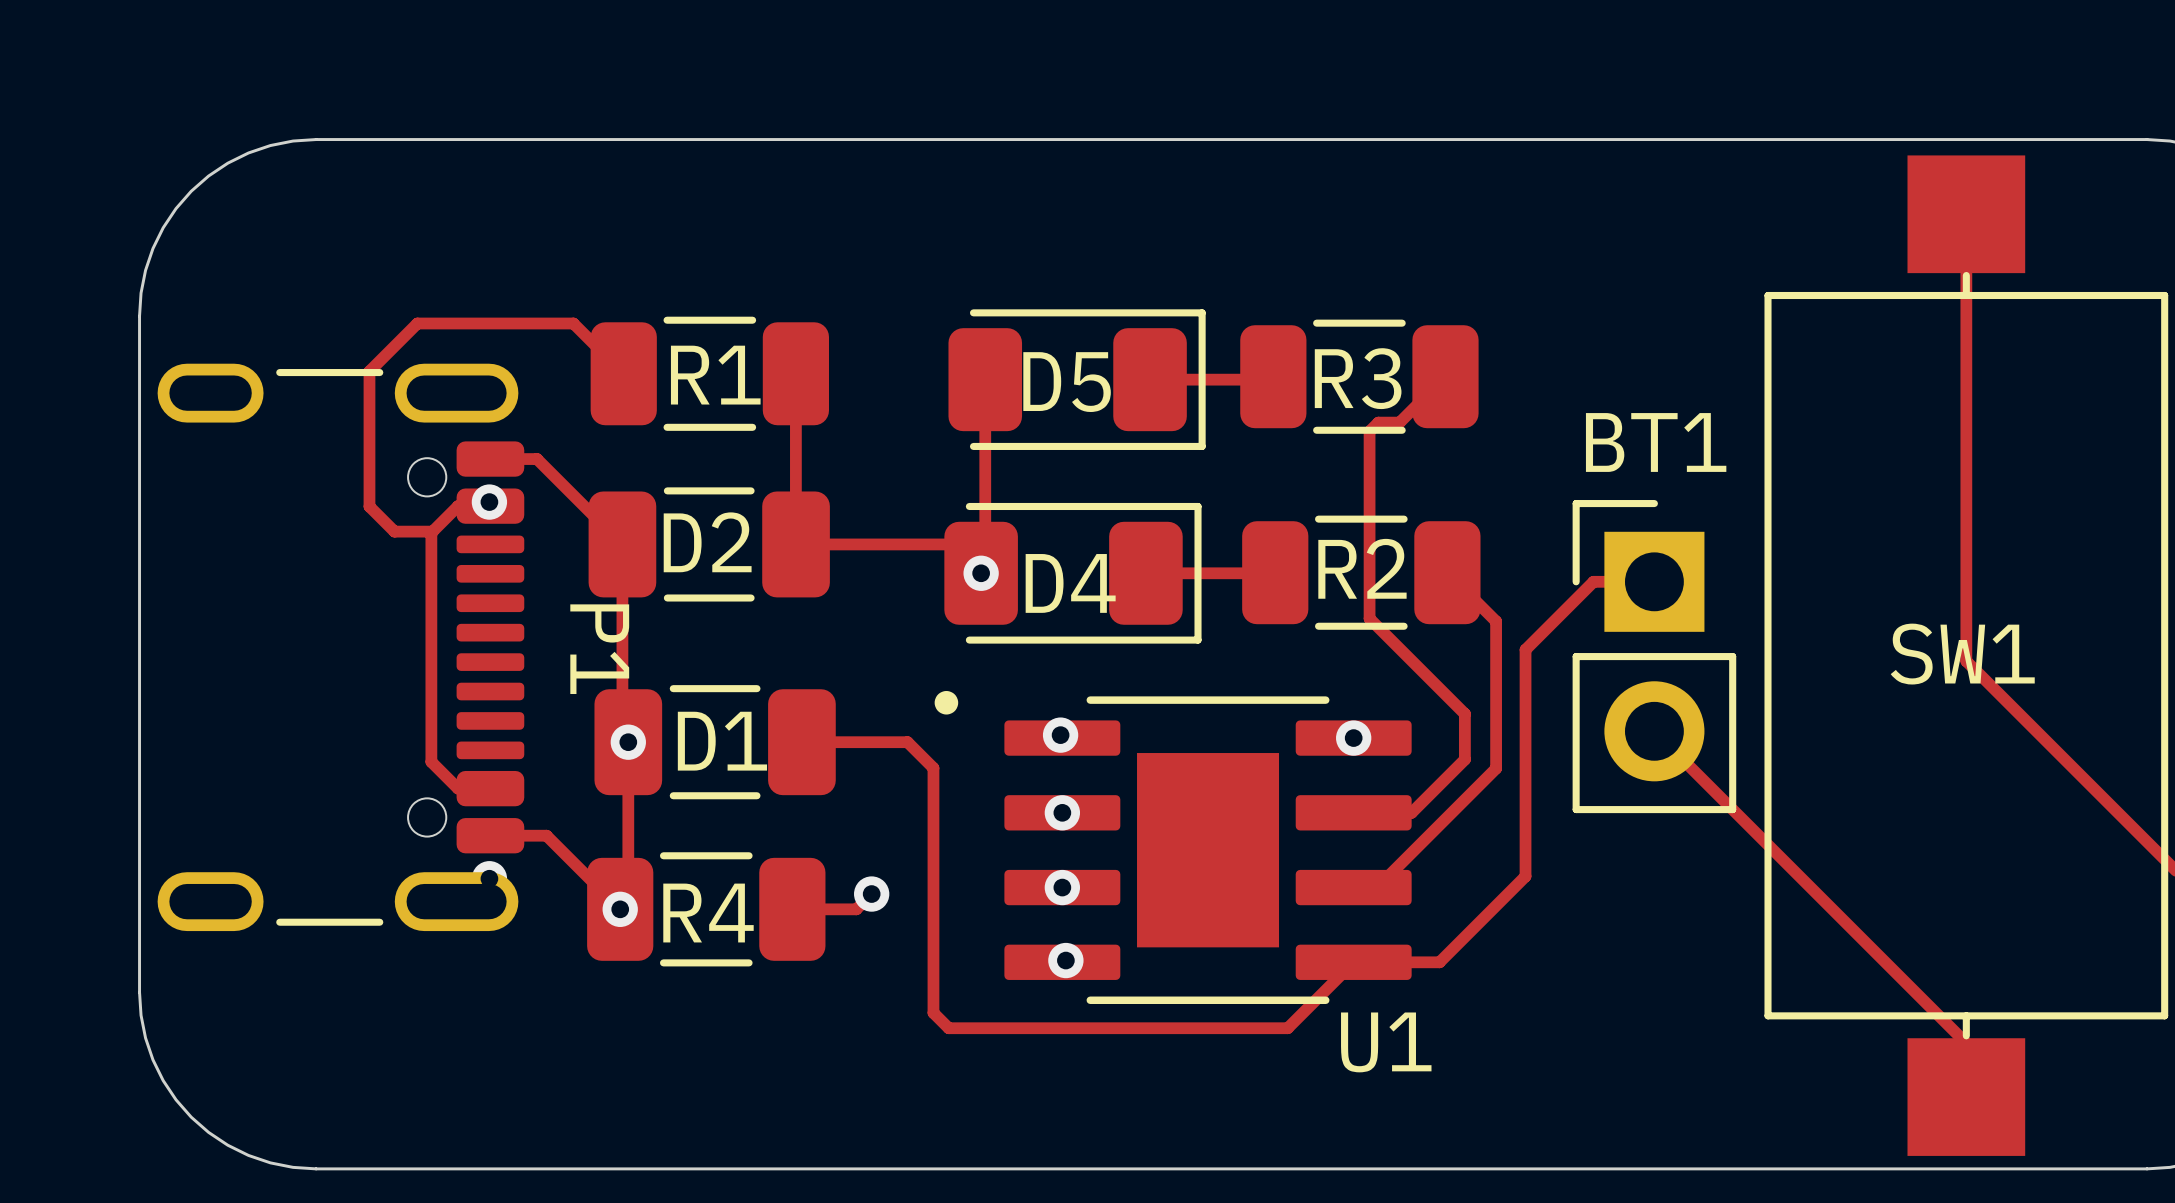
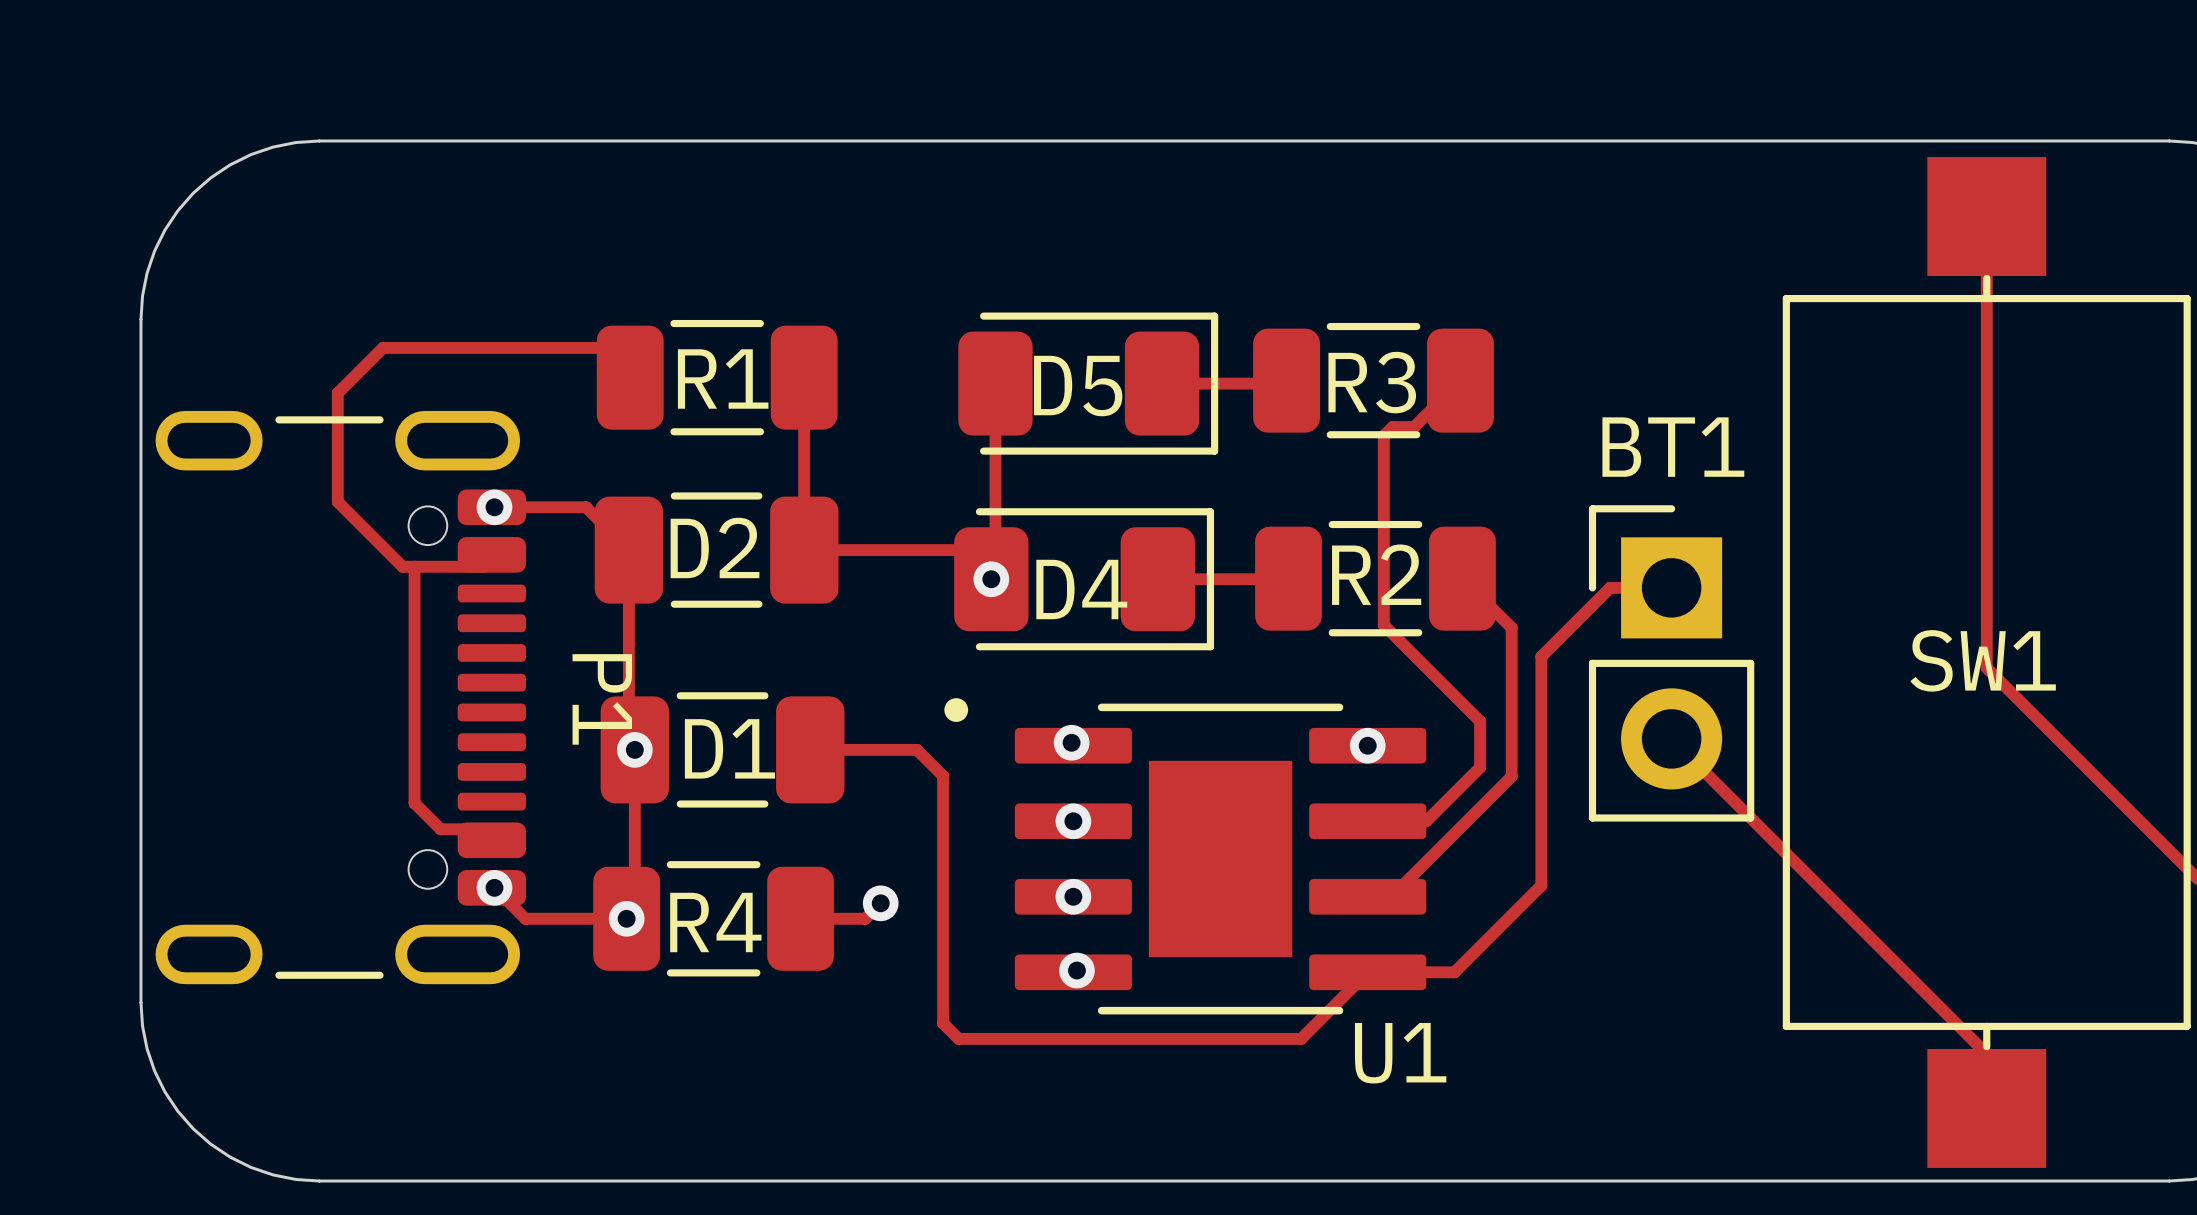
track: (594, 344) (573, 323) (417, 323) (369, 371) (369, 506) (394, 531) (432, 531) -> (600, 347) (383, 347) (337, 393) (337, 501) (402, 566) (482, 566) (494, 554)
track: (490, 459) (537, 459) (580, 502) -> (494, 507) (586, 507)
track: (490, 506) (458, 506) (431, 532) (431, 761) (458, 788) (490, 788) -> none
track: none -> (414, 566) (414, 803) (440, 829) (483, 829) (494, 840)
P1 position: (340, 647) -> (340, 697)
track: (490, 835) (546, 835) (620, 909) -> (494, 887) (525, 918) (626, 918)

